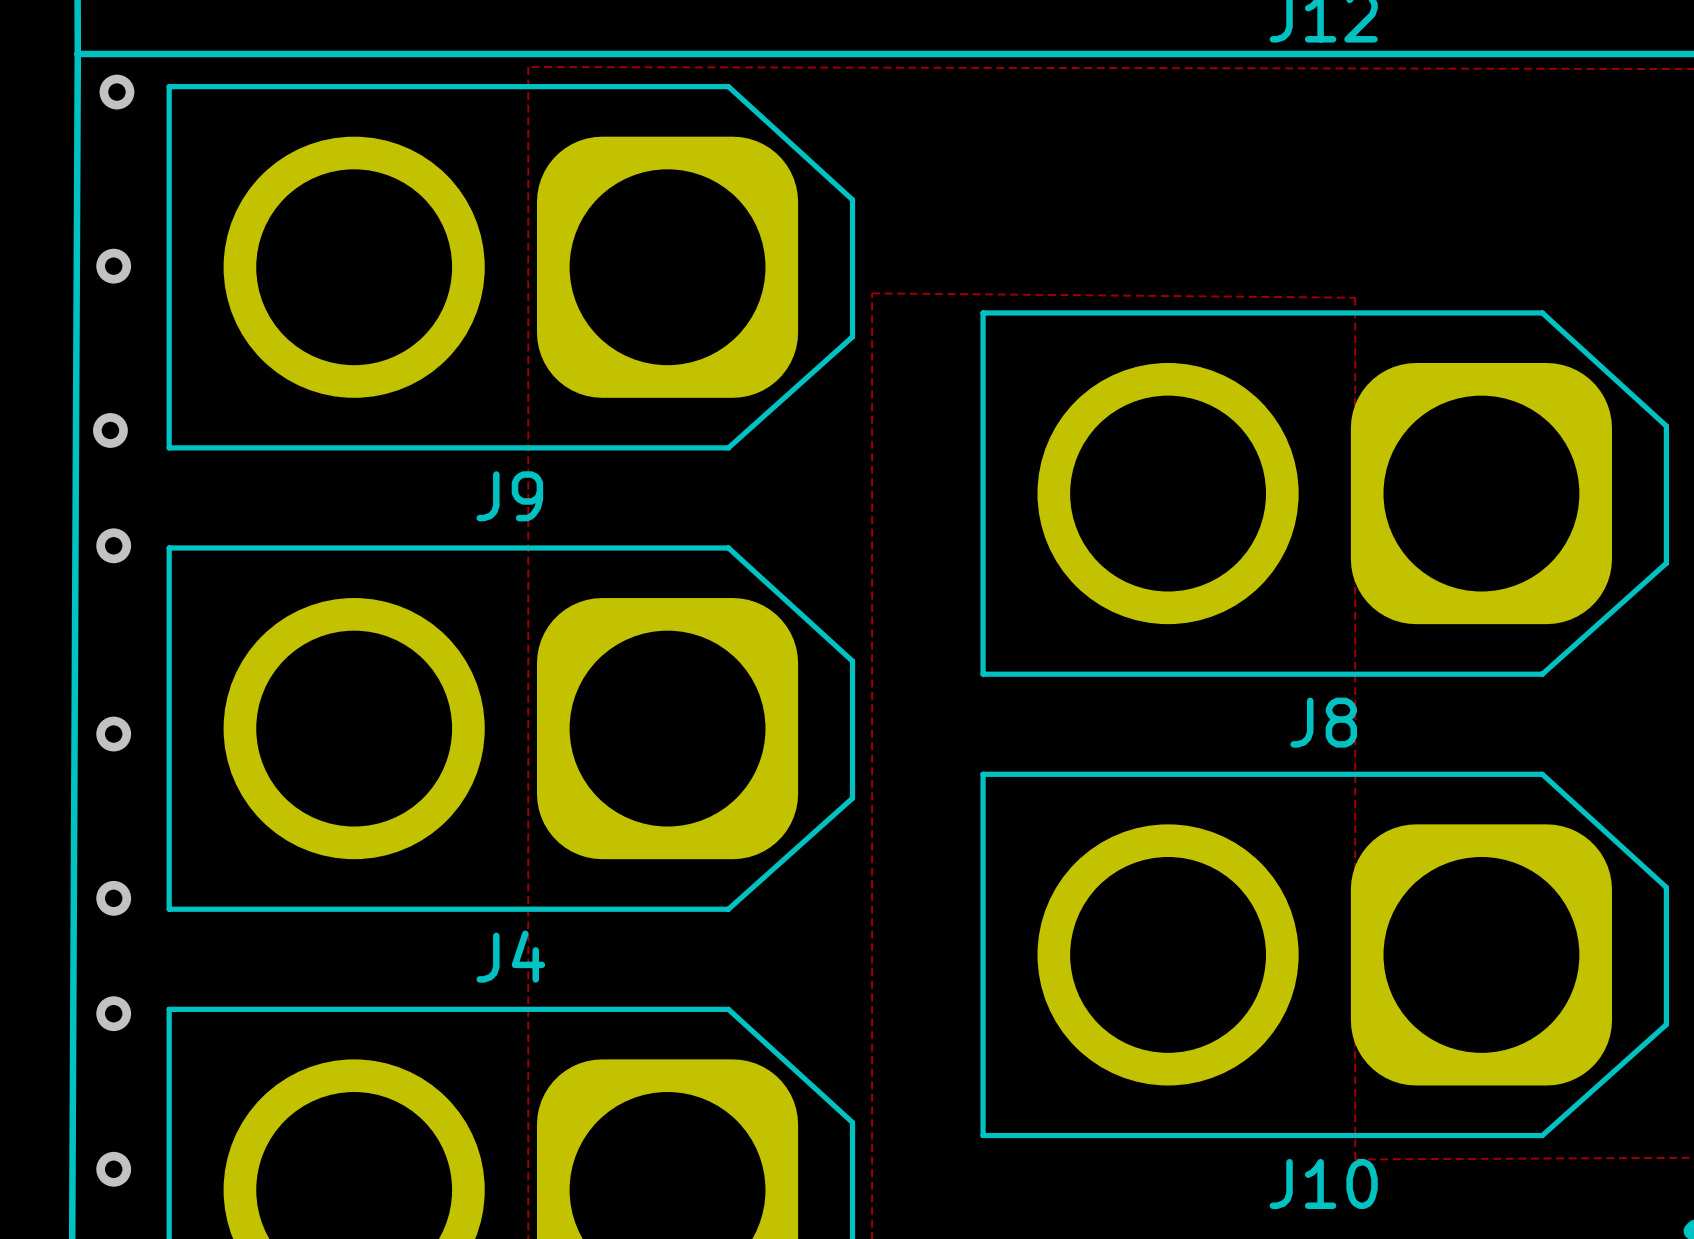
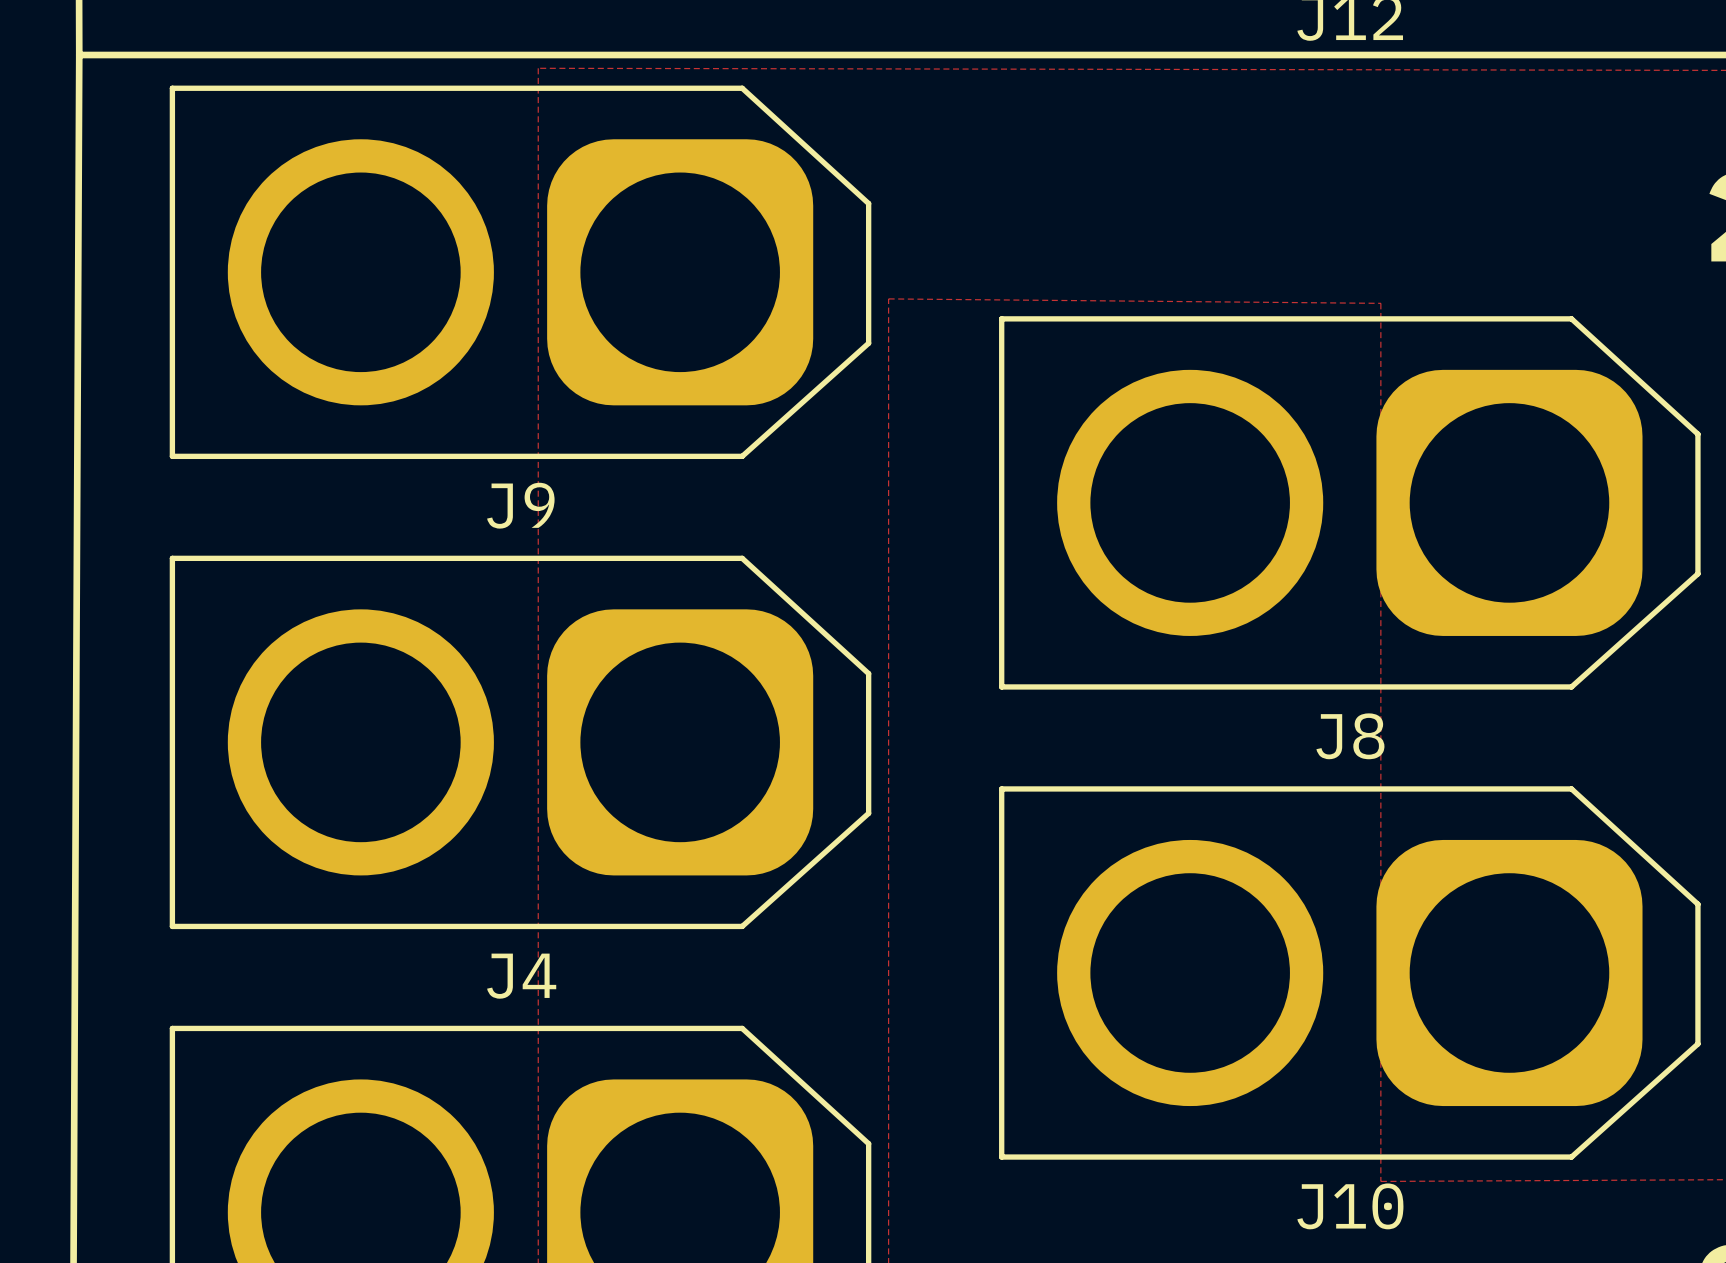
via: (116, 92) -> none
via: (113, 266) -> none
via: (110, 430) -> none
via: (113, 545) -> none
via: (113, 734) -> none
via: (113, 898) -> none
via: (113, 1013) -> none
via: (113, 1169) -> none

